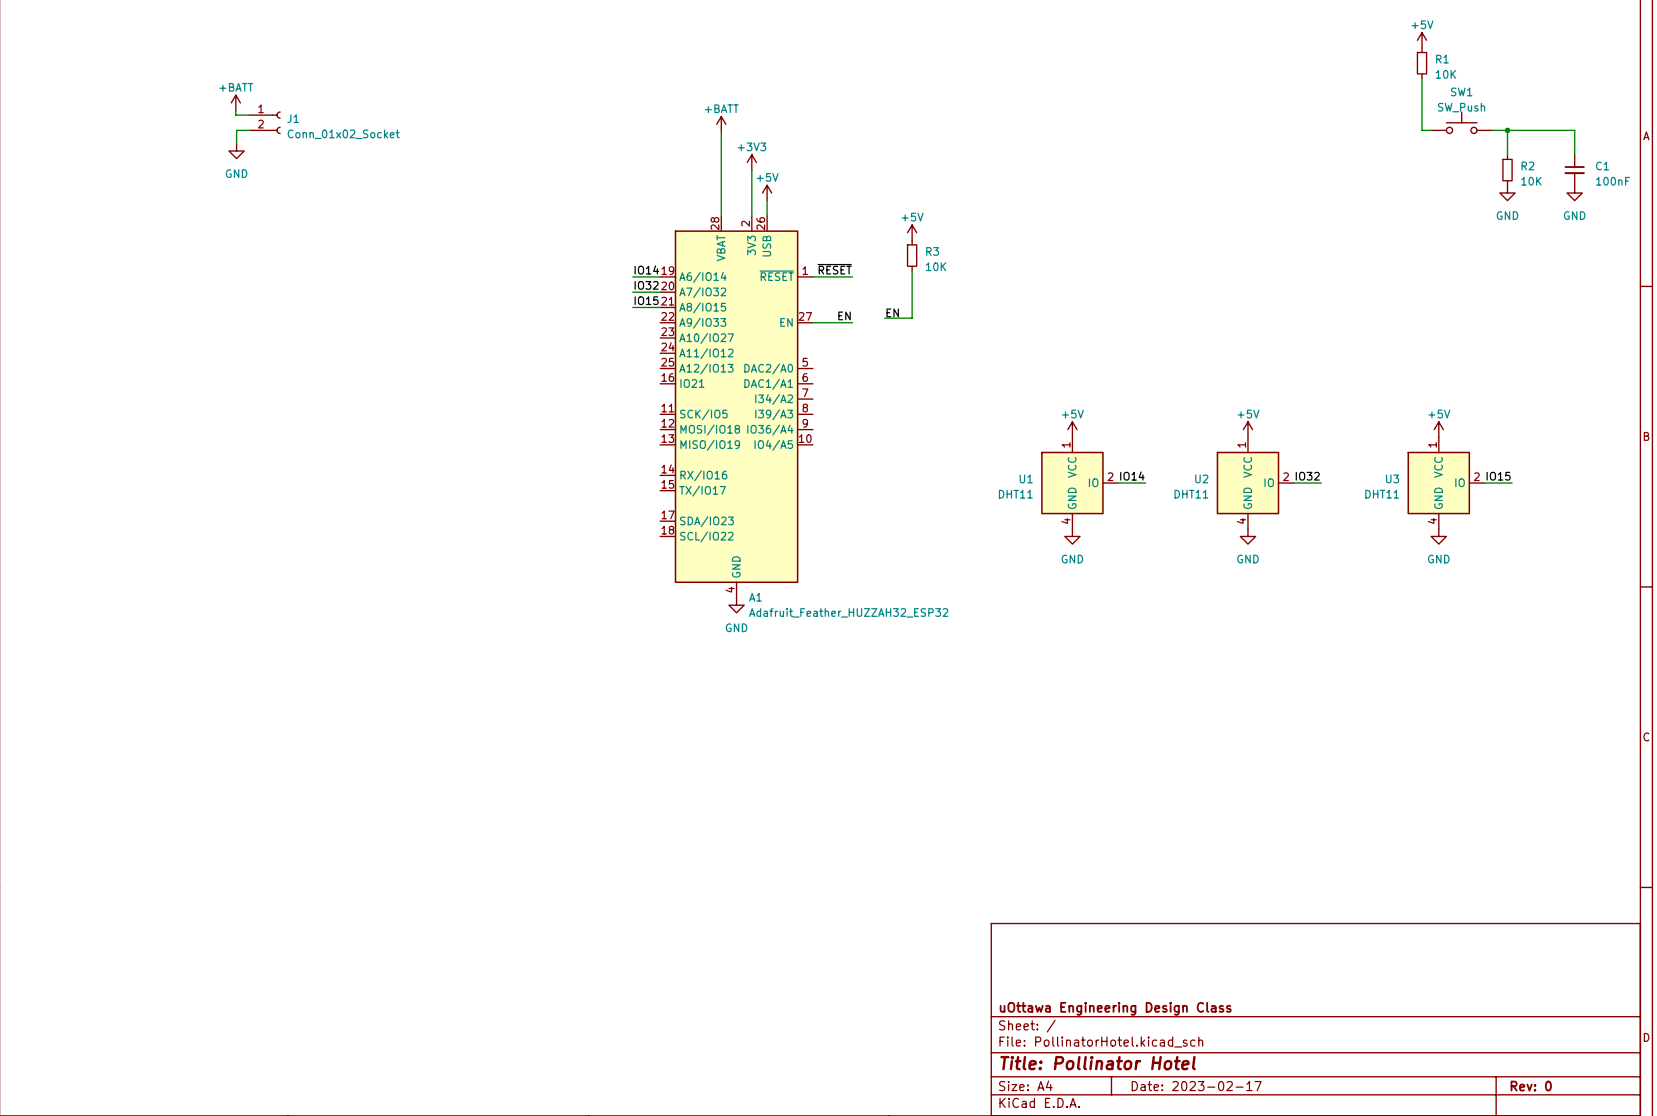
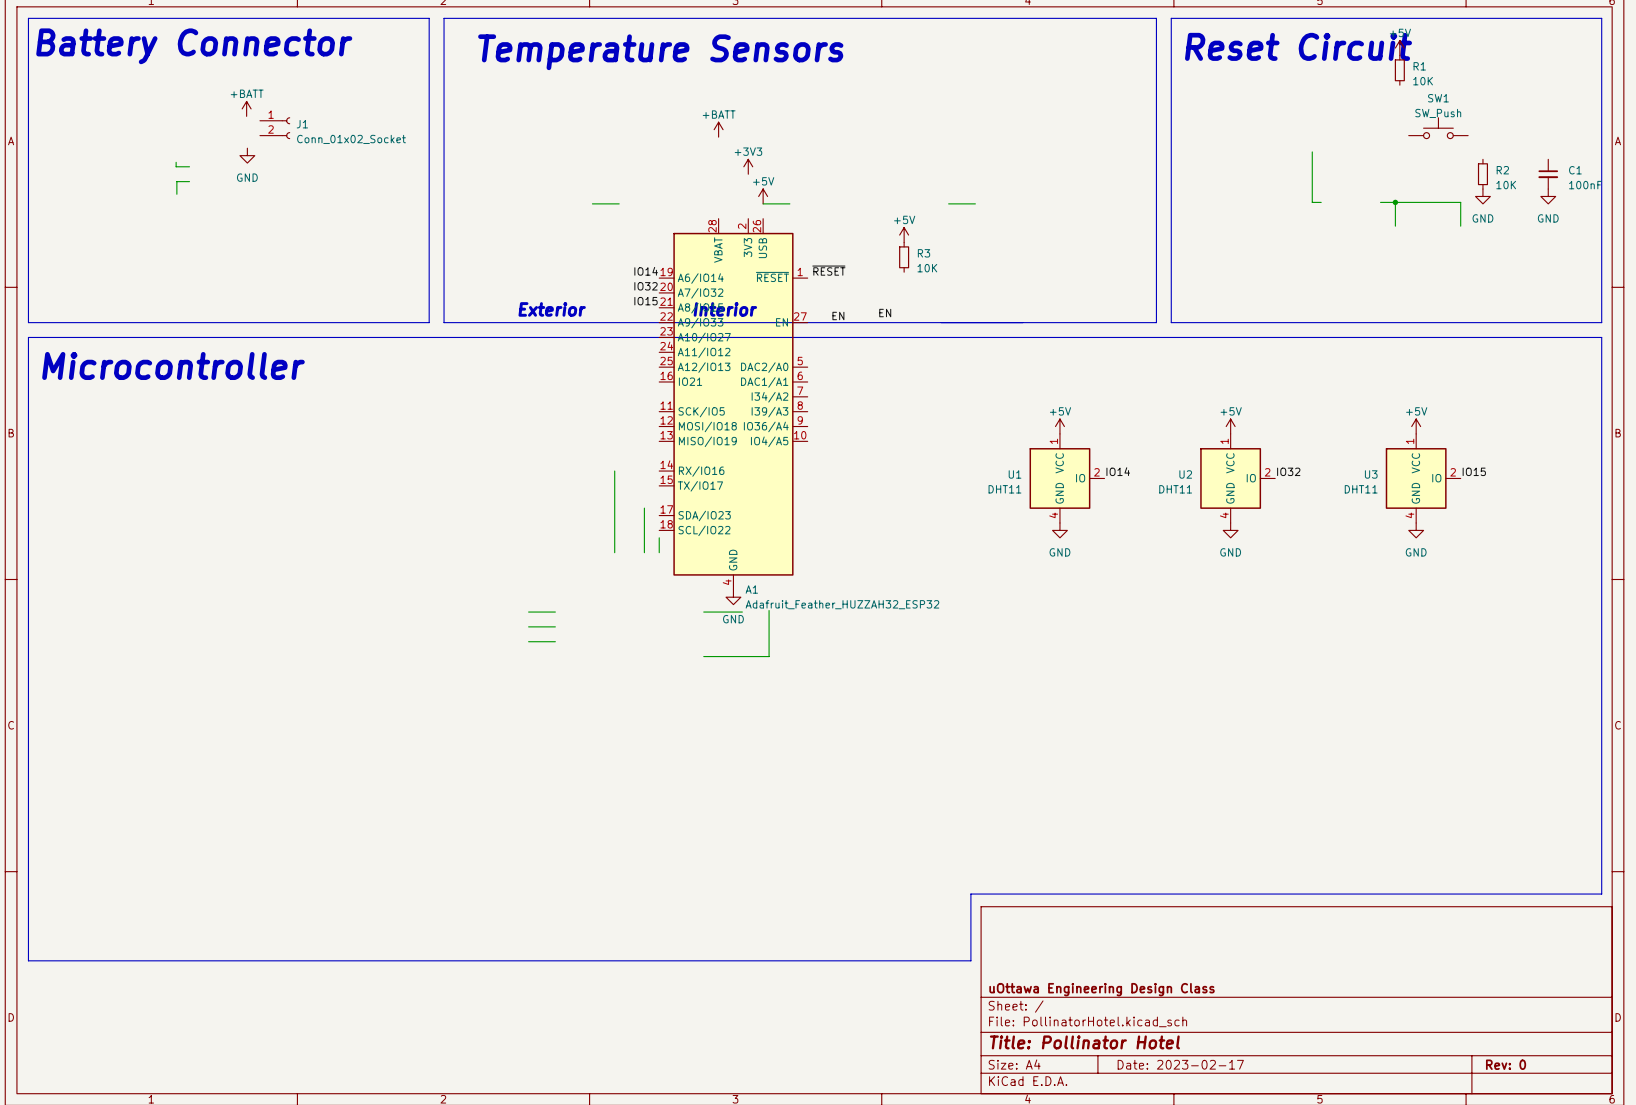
line: none -> (28, 18) (28, 322) (429, 322) (429, 18) (28, 18)
line: none -> (444, 18) (444, 322) (1156, 322) (1156, 18) (444, 18)
line: none -> (1171, 18) (1601, 18) (1601, 322) (1171, 322) (1171, 18)
text: none -> Battery Connector (194, 46)
text: none -> Reset Circuit (1298, 46)
text: none -> Temperature Sensors (660, 52)
wire: (1422, 78) (1422, 130) (1431, 130) -> (1312, 151) (1312, 202) (1321, 202)
wire: (235, 110) (235, 115) (249, 115) -> (176, 162) (176, 166) (189, 166)
wire: (249, 130) (236, 130) (236, 143) -> (189, 181) (176, 181) (176, 194)
wire: (1492, 130) (1574, 130) (1574, 154) -> (1380, 202) (1460, 202) (1460, 226)
wire: (1507, 130) (1507, 154) -> (1395, 202) (1395, 226)
junction: (1507, 130) -> none
wire: (721, 131) (721, 215) -> none
wire: (751, 170) (751, 215) -> none
junction: none -> (1395, 202)
wire: (767, 200) (767, 215) -> (763, 203) (789, 203)
wire: none -> (948, 203) (975, 203)
wire: (912, 270) (912, 318) (884, 318) -> none
wire: (632, 276) (660, 276) -> (592, 203) (619, 203)
wire: (812, 276) (852, 276) -> none
wire: (632, 292) (660, 292) -> none
wire: (632, 307) (660, 307) -> none
text: none -> Exterior (552, 309)
text: none -> Interior (725, 309)
line: none -> (28, 337) (28, 960) (970, 960) (970, 894) (1601, 894) (1601, 337) (28, 337)
text: none -> Microcontroller (173, 365)
wire: none -> (614, 471) (614, 552)
wire: (1118, 483) (1145, 483) -> none
wire: (1293, 483) (1321, 483) -> none
wire: (1484, 483) (1512, 483) -> none
wire: none -> (644, 508) (644, 552)
wire: none -> (659, 537) (659, 552)
wire: none -> (769, 610) (769, 656) (703, 656)
wire: none -> (528, 612) (555, 612)
wire: none -> (703, 612) (742, 612)
wire: none -> (528, 626) (555, 626)
wire: none -> (528, 641) (555, 641)

